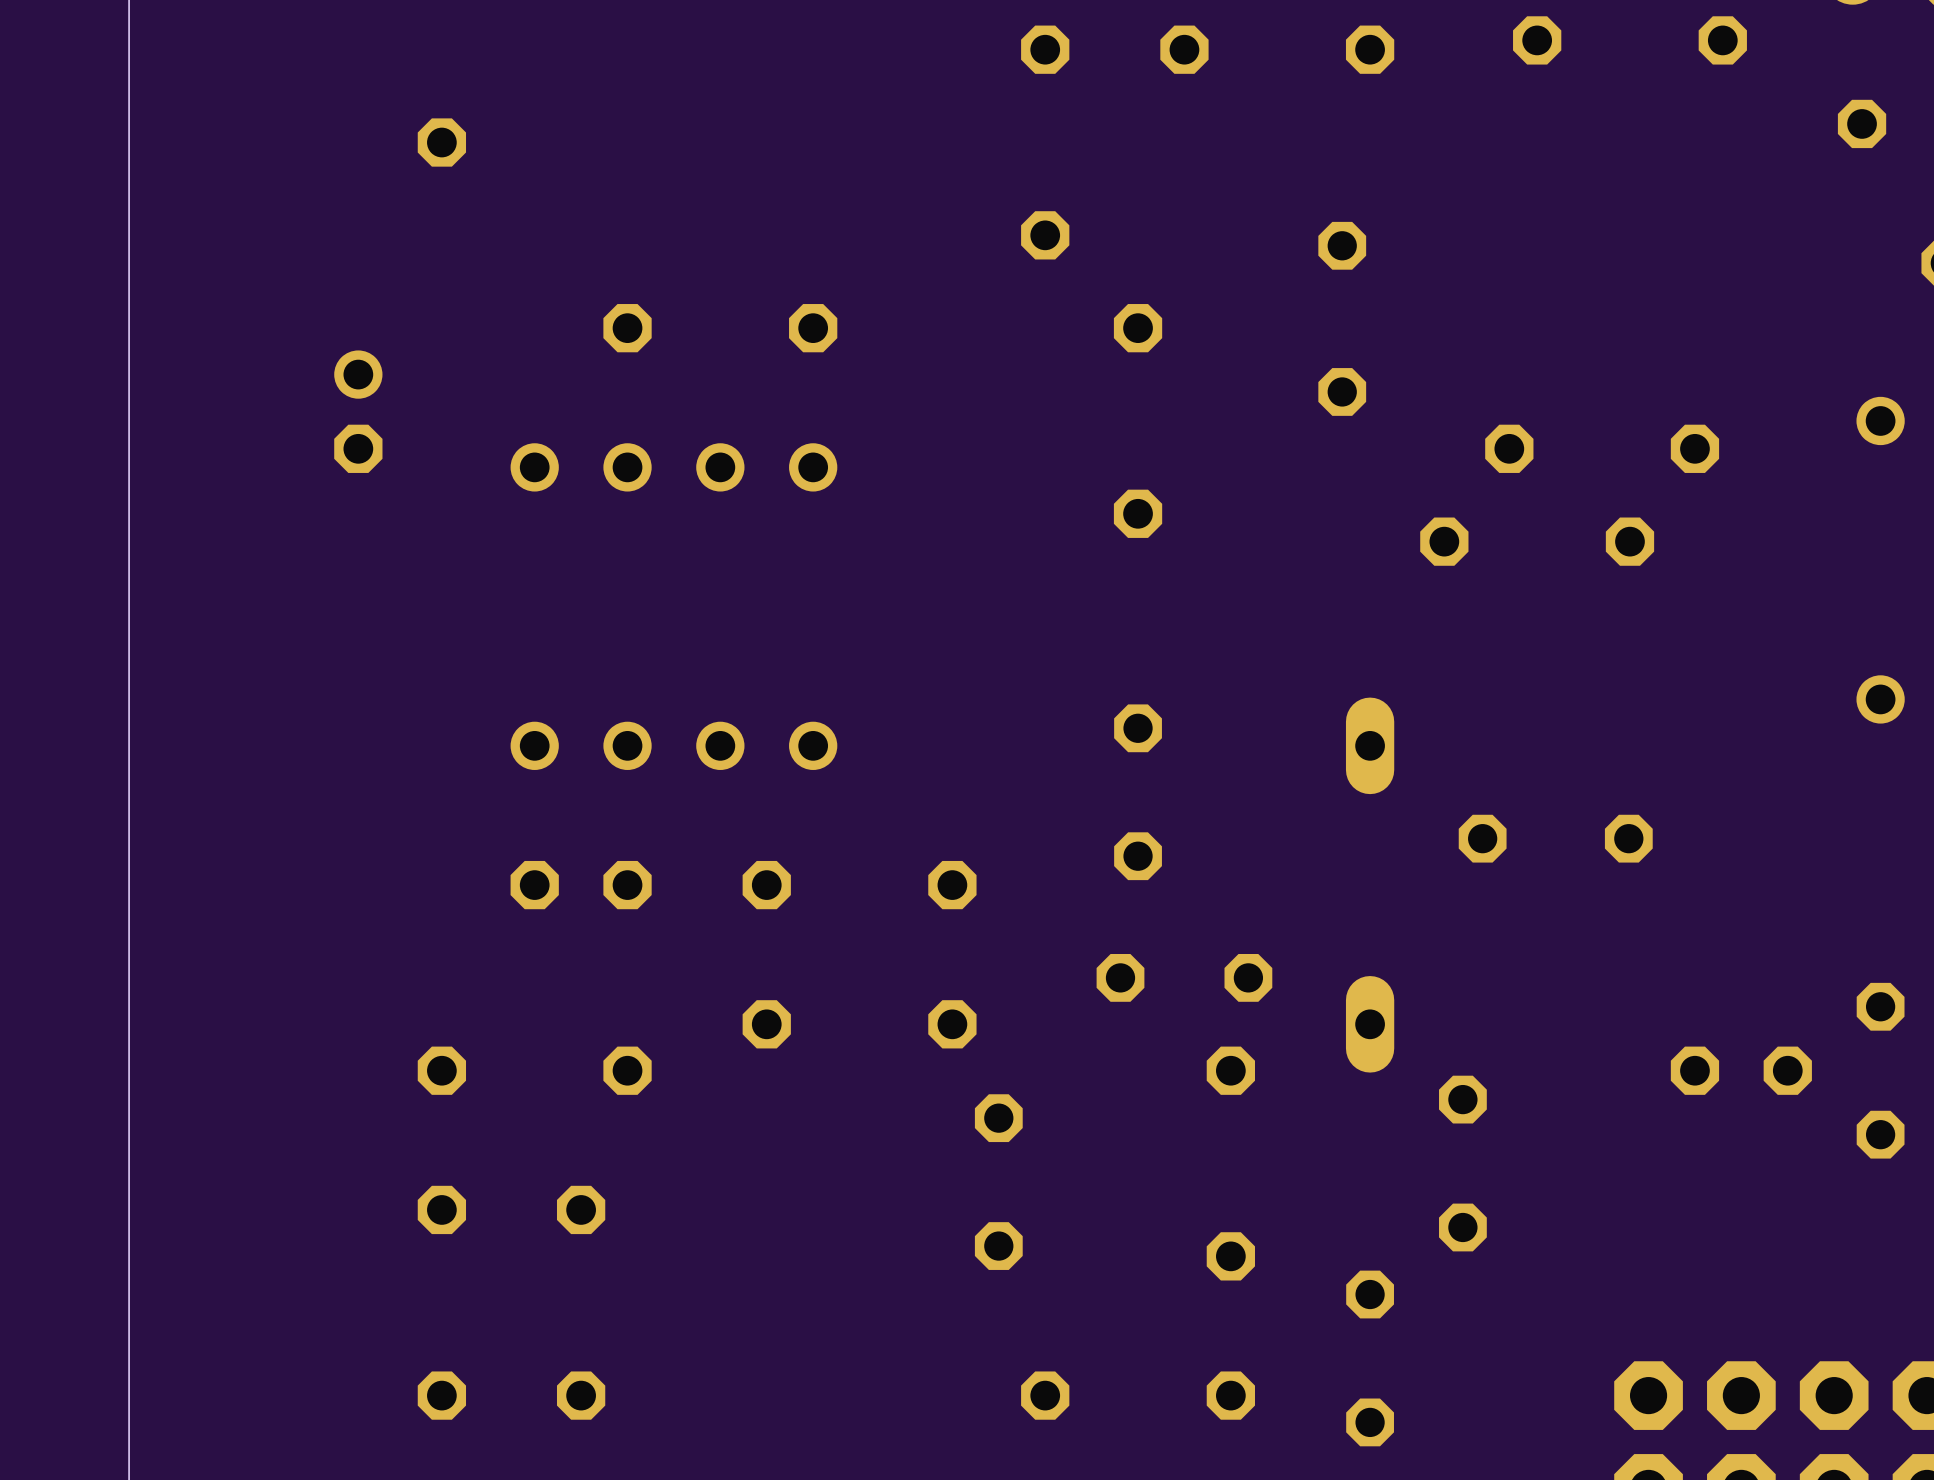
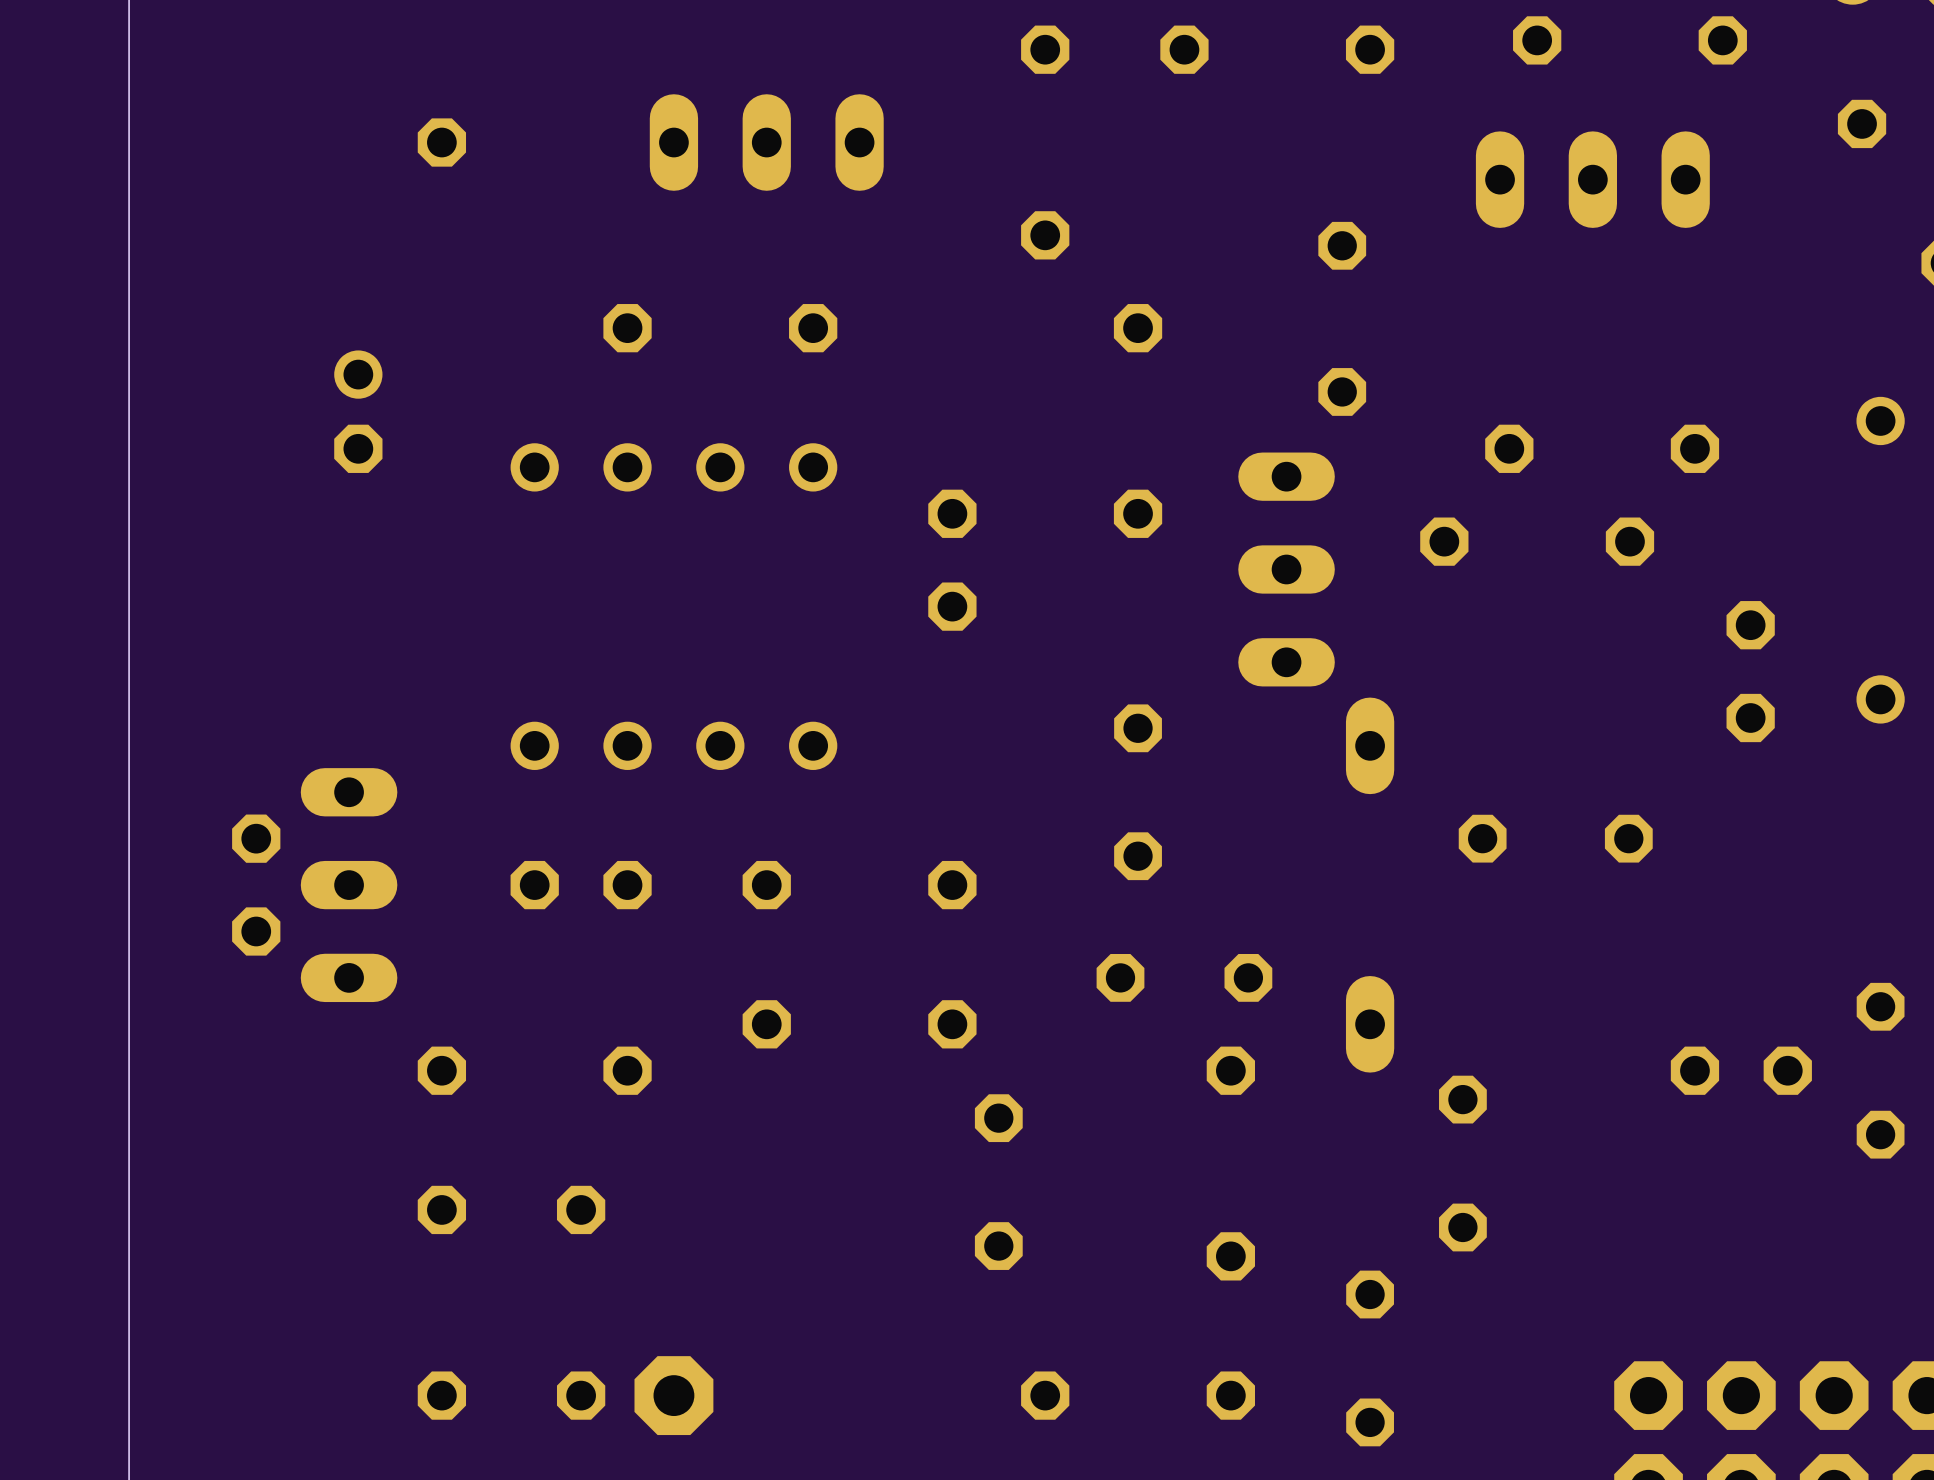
part: none -> (766, 142)
part: none -> (1592, 179)
part: none -> (952, 560)
part: none -> (1286, 569)
part: none -> (1750, 671)
part: none -> (256, 885)
part: none -> (349, 885)
part: none -> (673, 1395)

